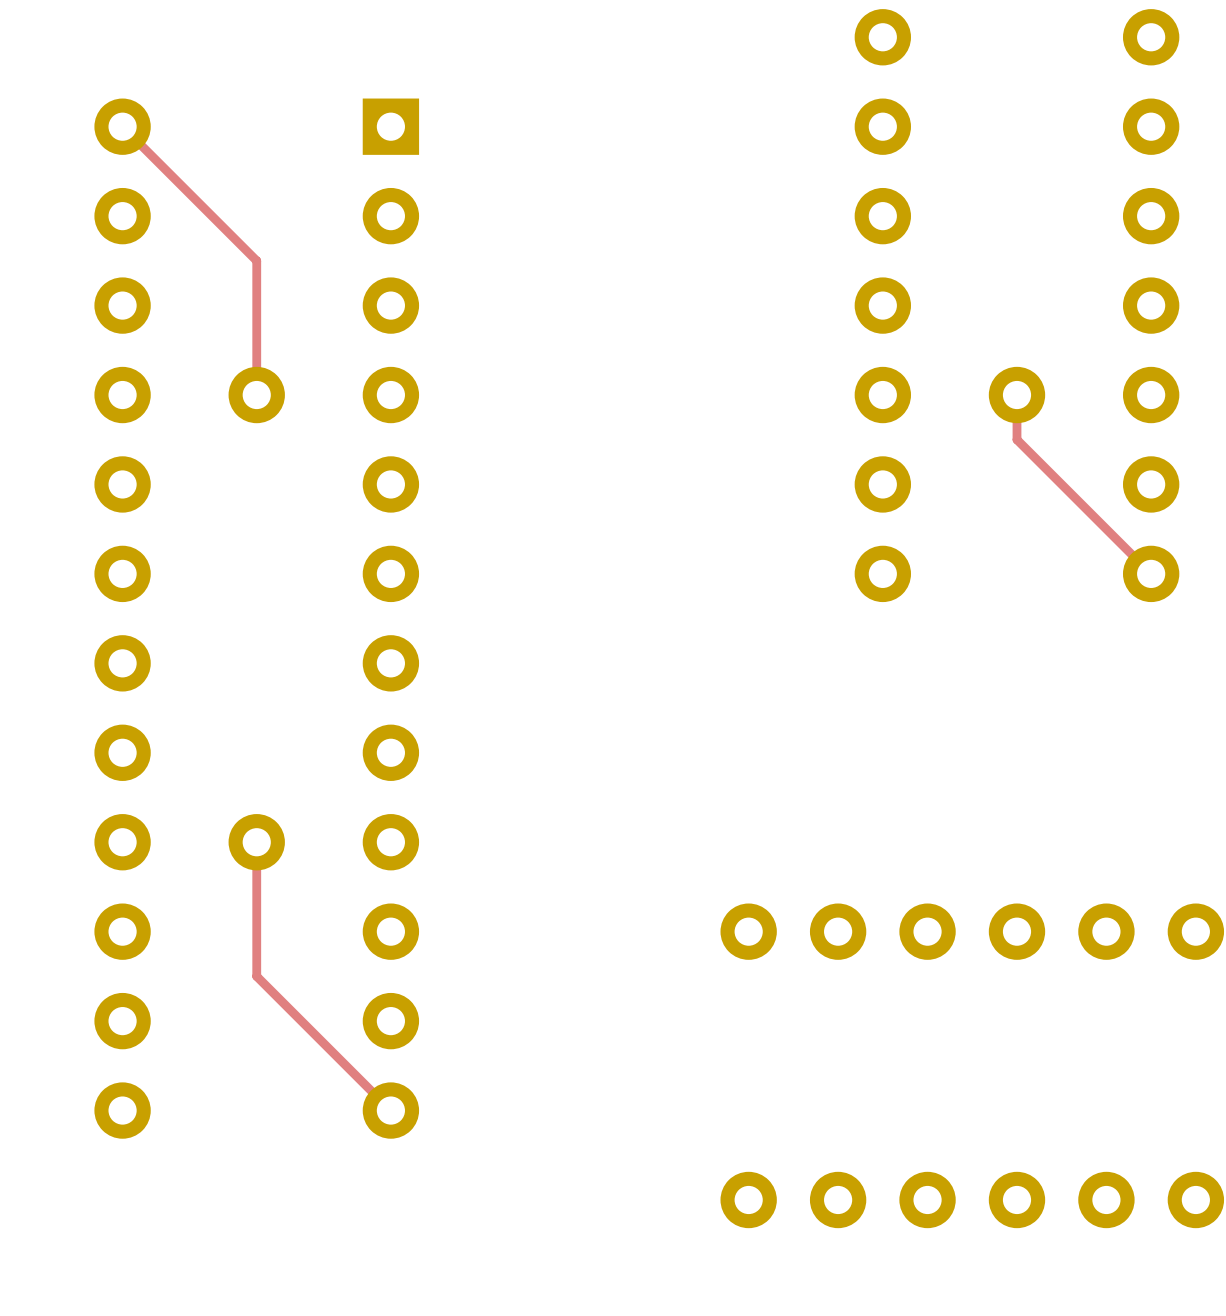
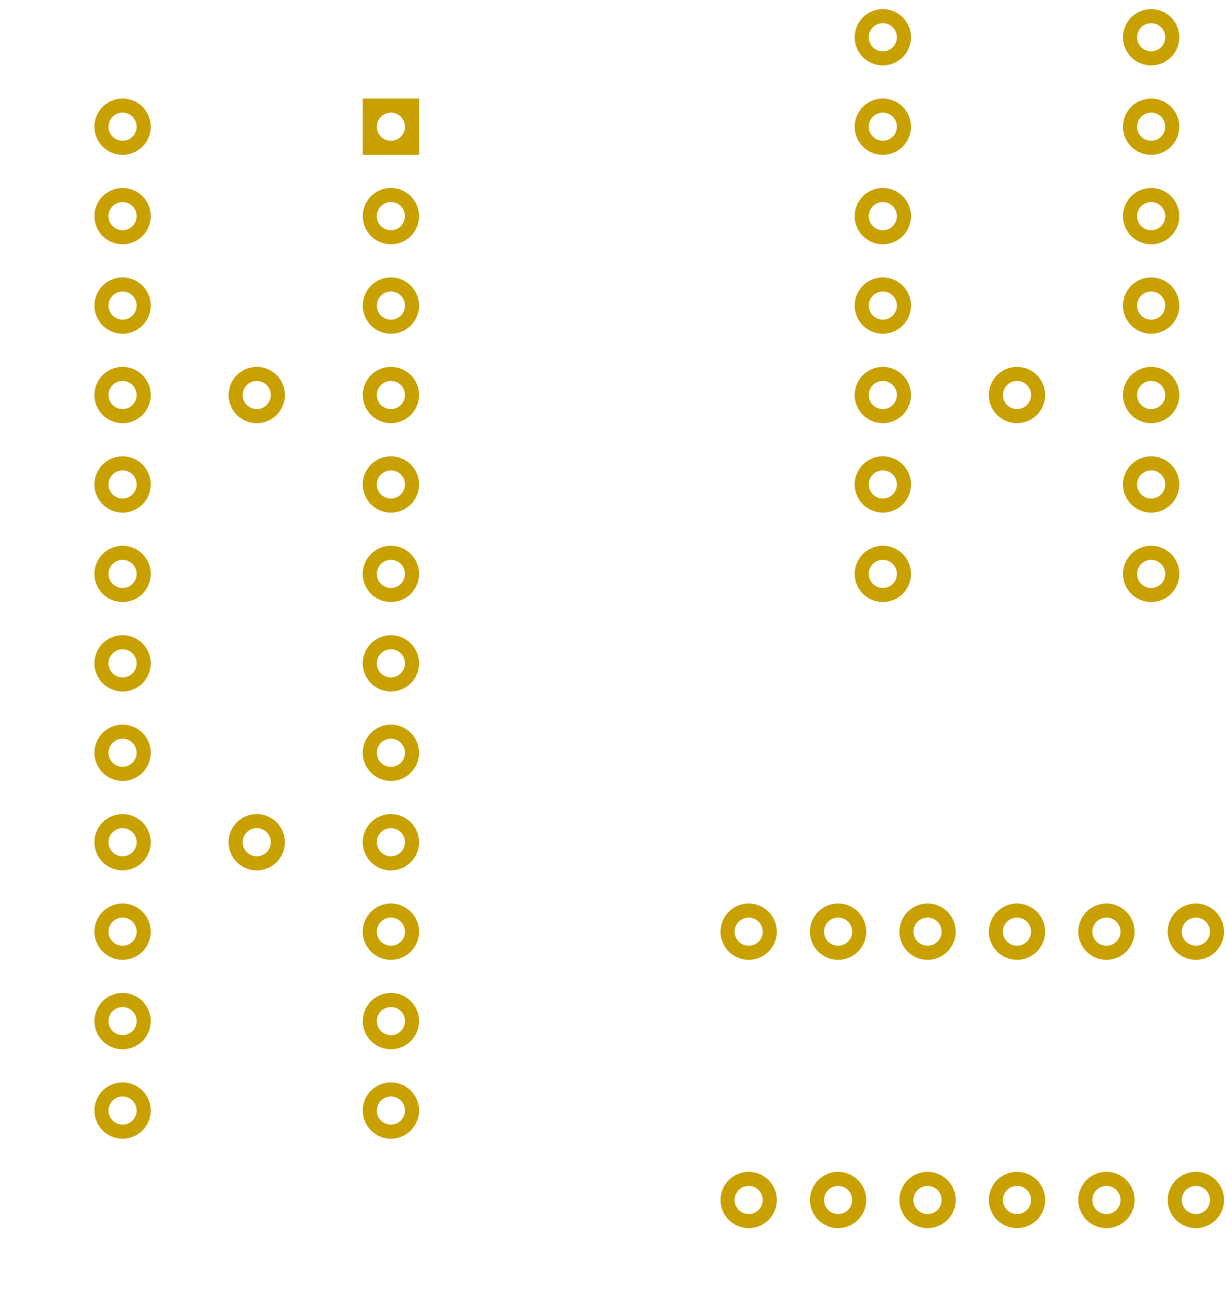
top track: (122, 126) (256, 260) (256, 395) -> none
top track: (1016, 395) (1016, 439) (1151, 573) -> none
top track: (256, 842) (256, 976) (390, 1110) -> none

